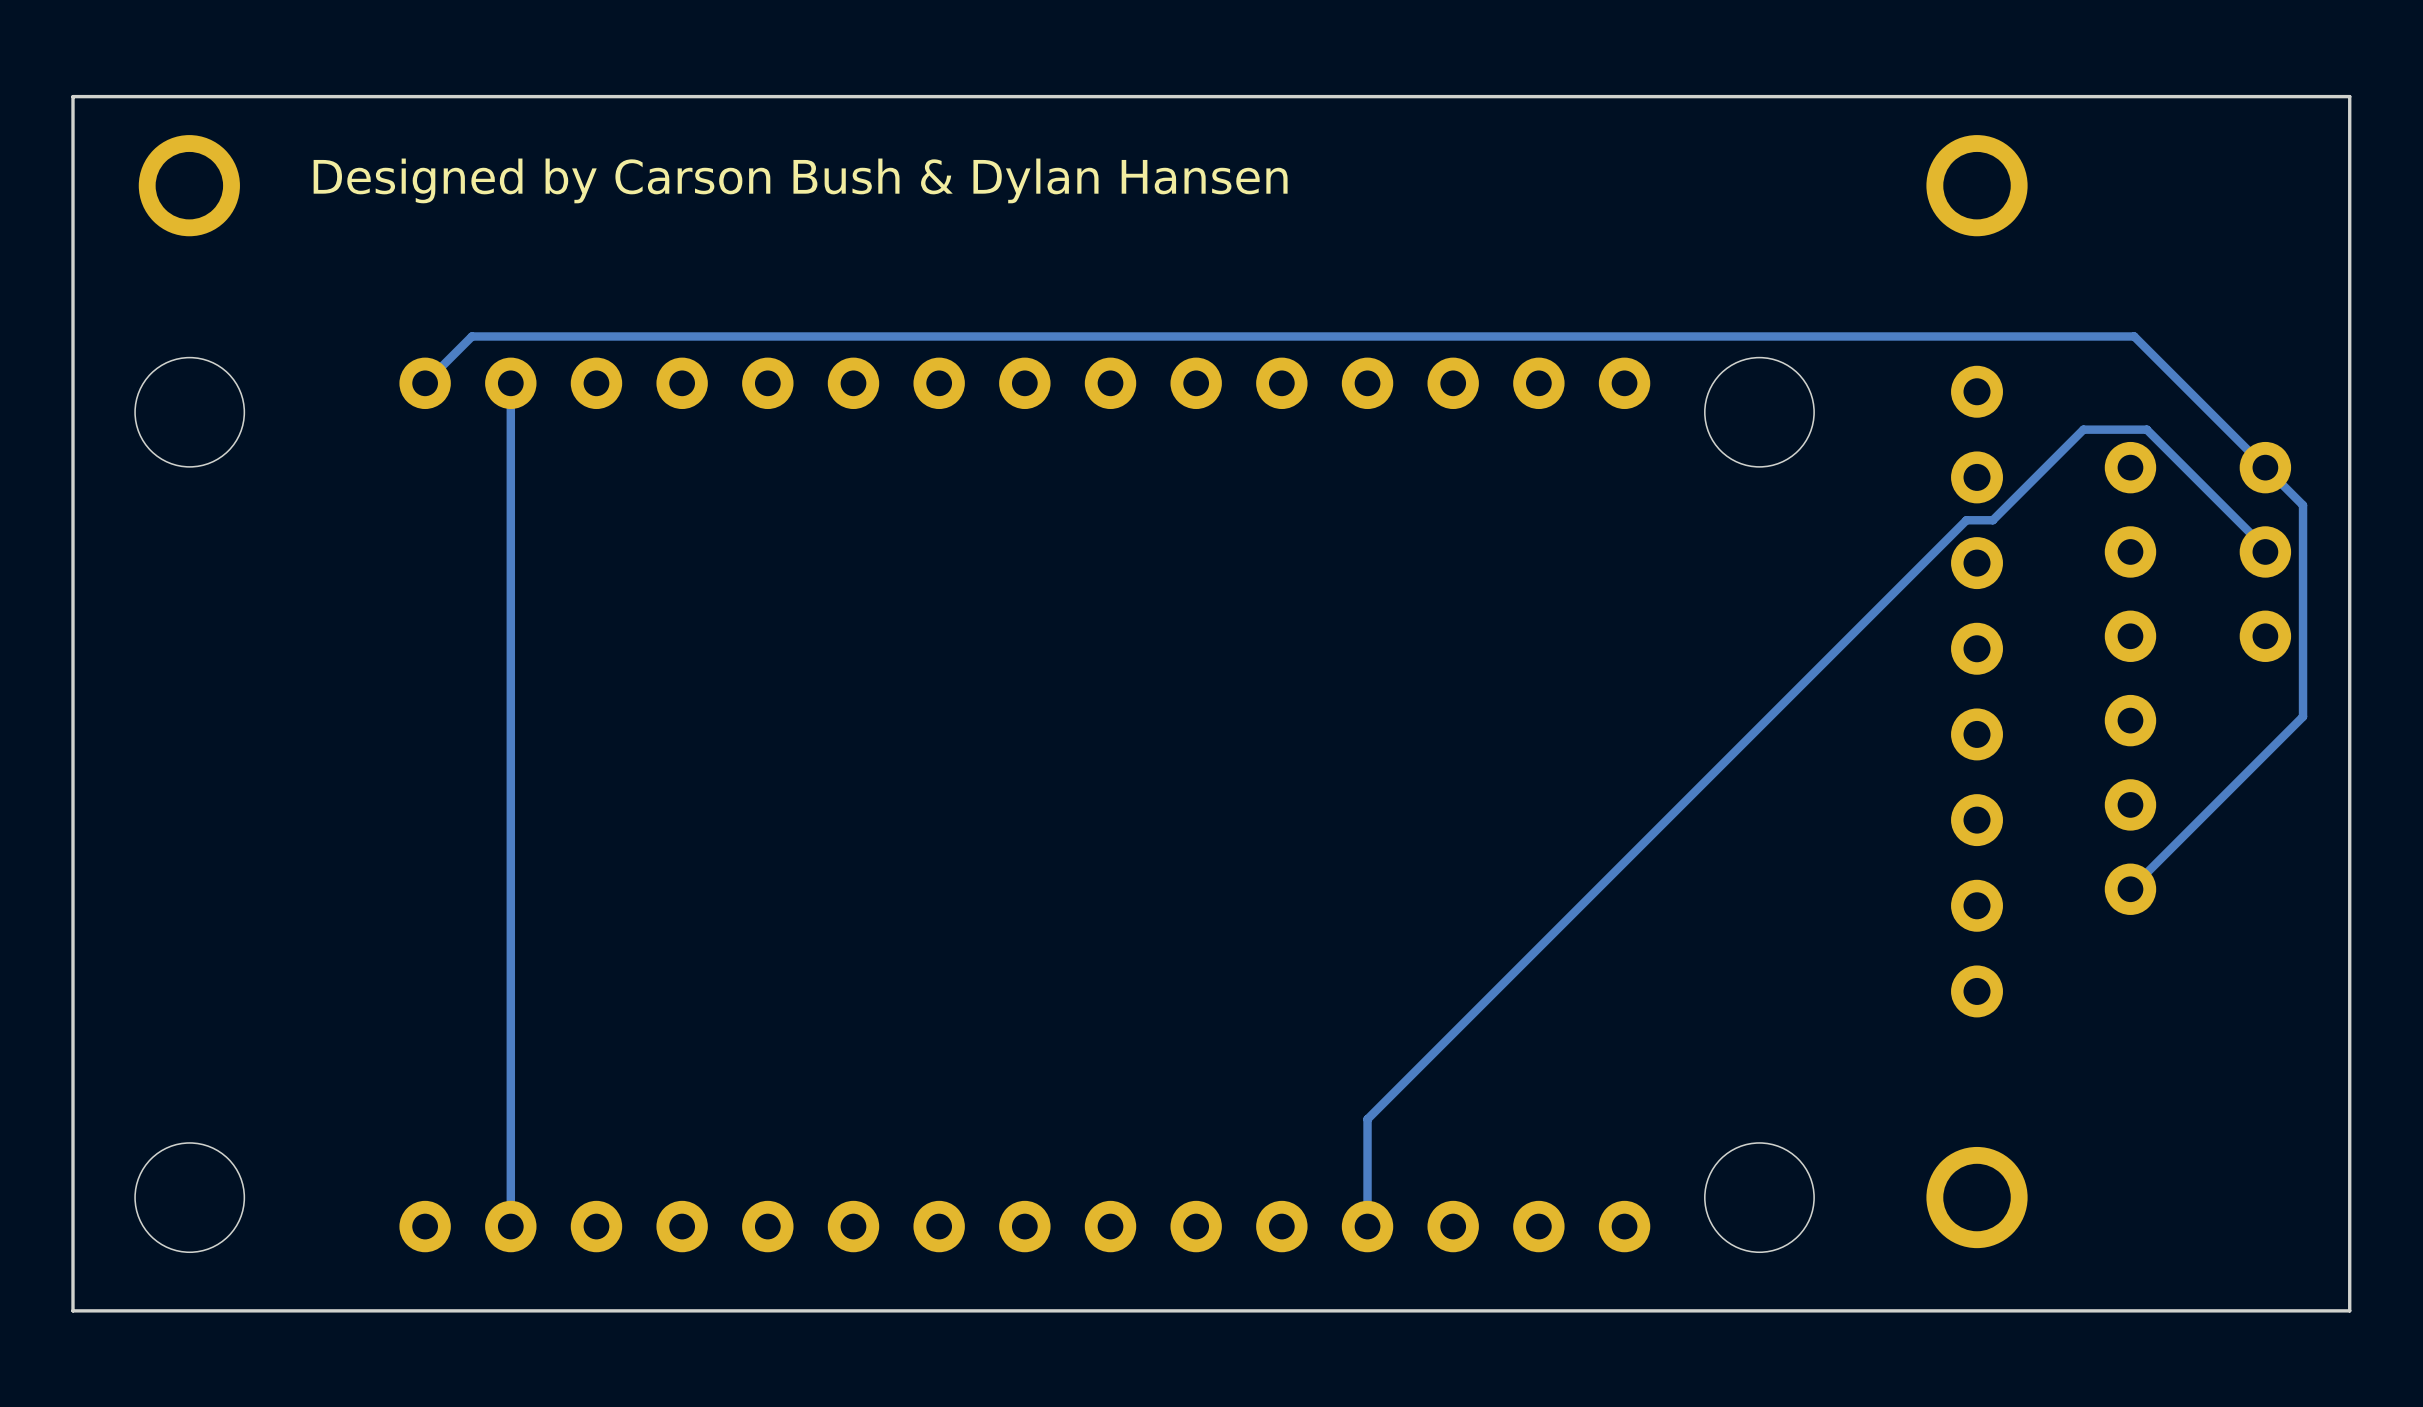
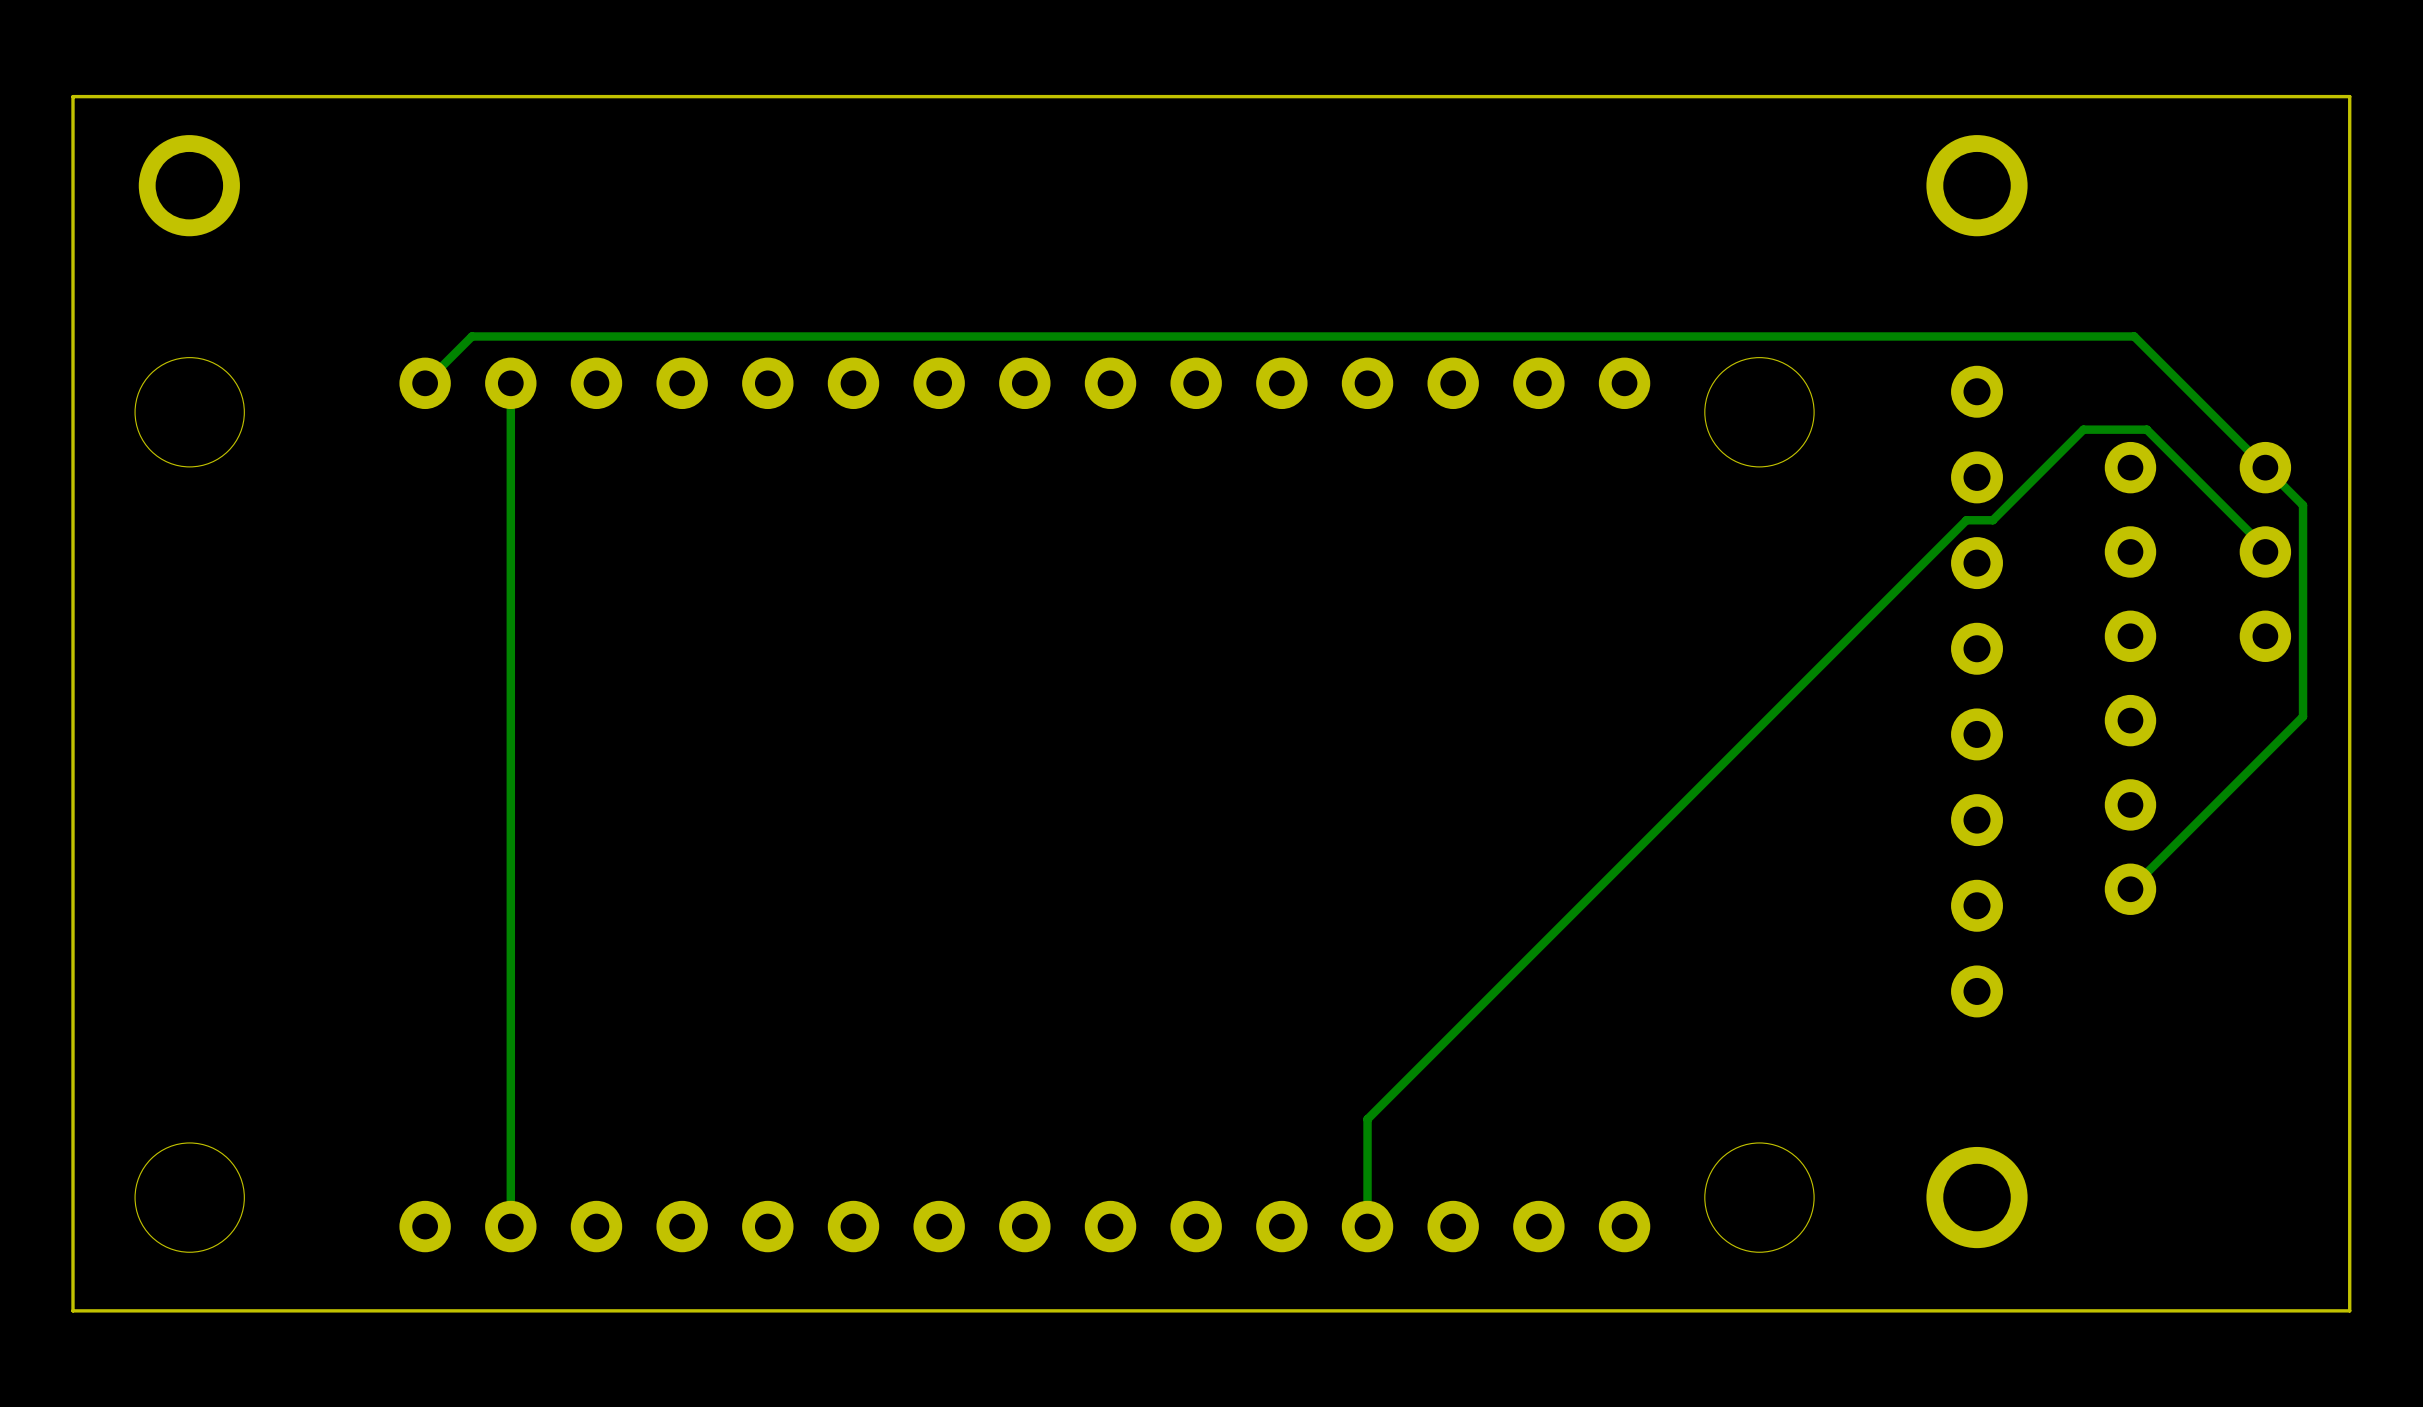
text: Designed by Carson Bush & Dylan Hansen (800, 180) -> none

